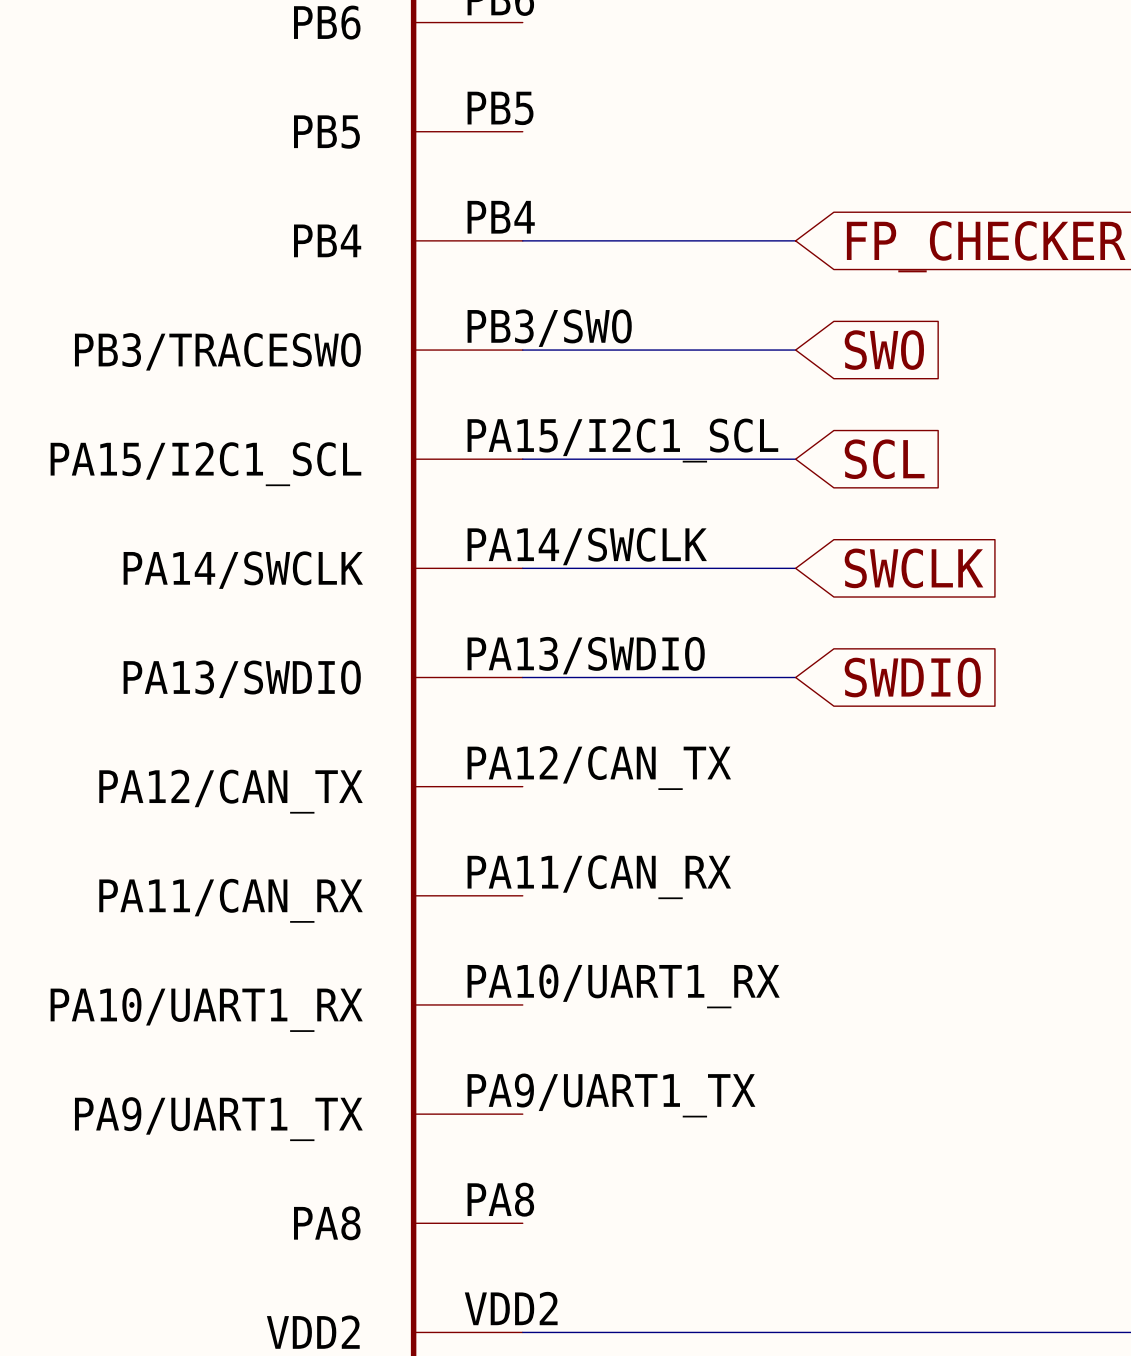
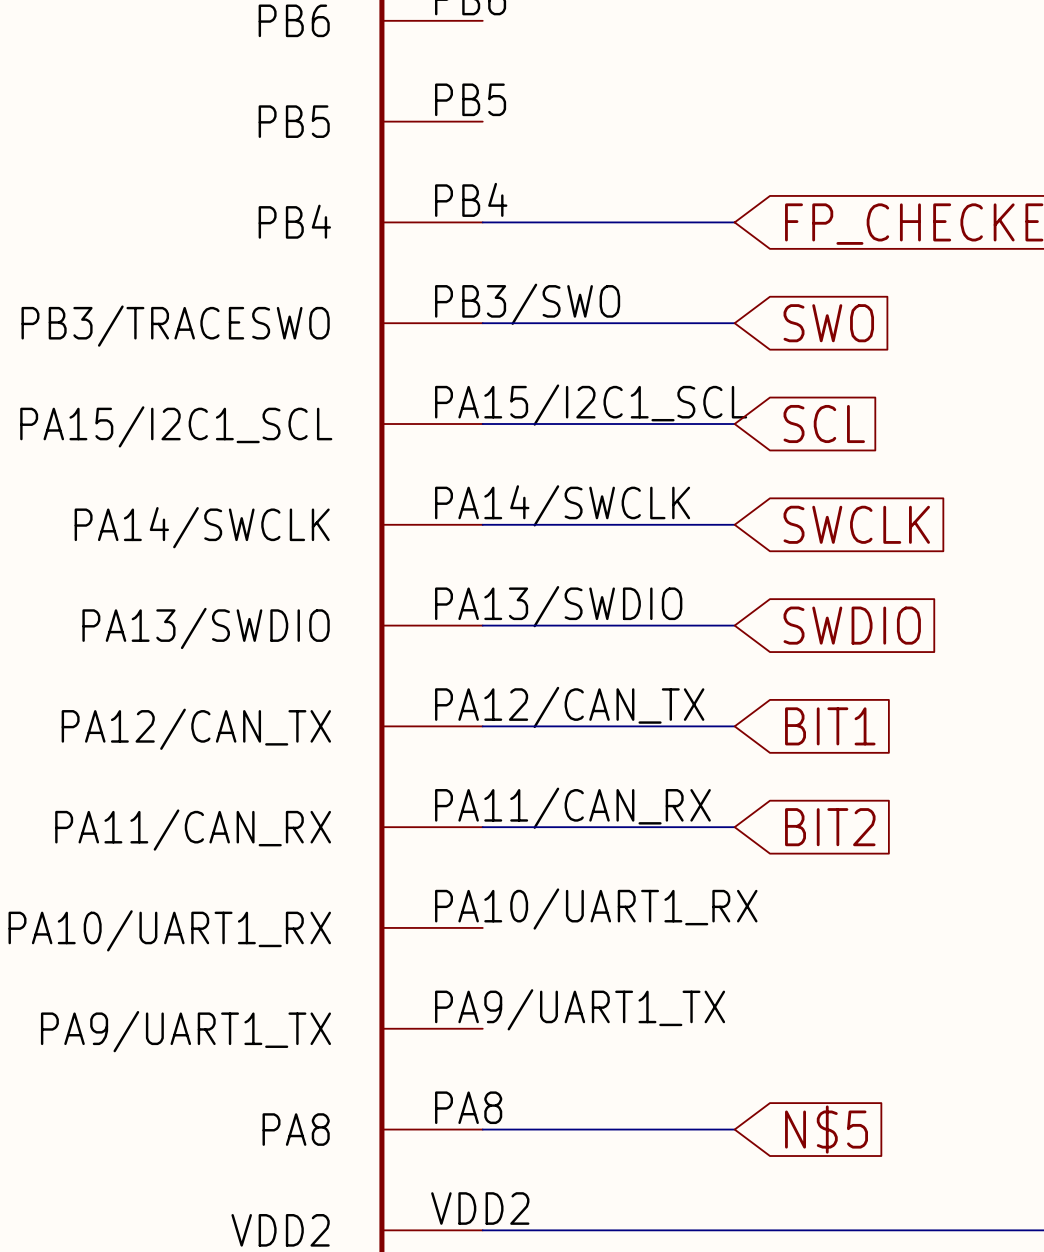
wire: none -> (482, 726) (734, 726)
global label: none -> BIT1 (830, 726)
wire: none -> (482, 827) (734, 827)
global label: none -> BIT2 (830, 827)
wire: none -> (482, 1129) (734, 1129)
global label: none -> N$5 (826, 1129)

